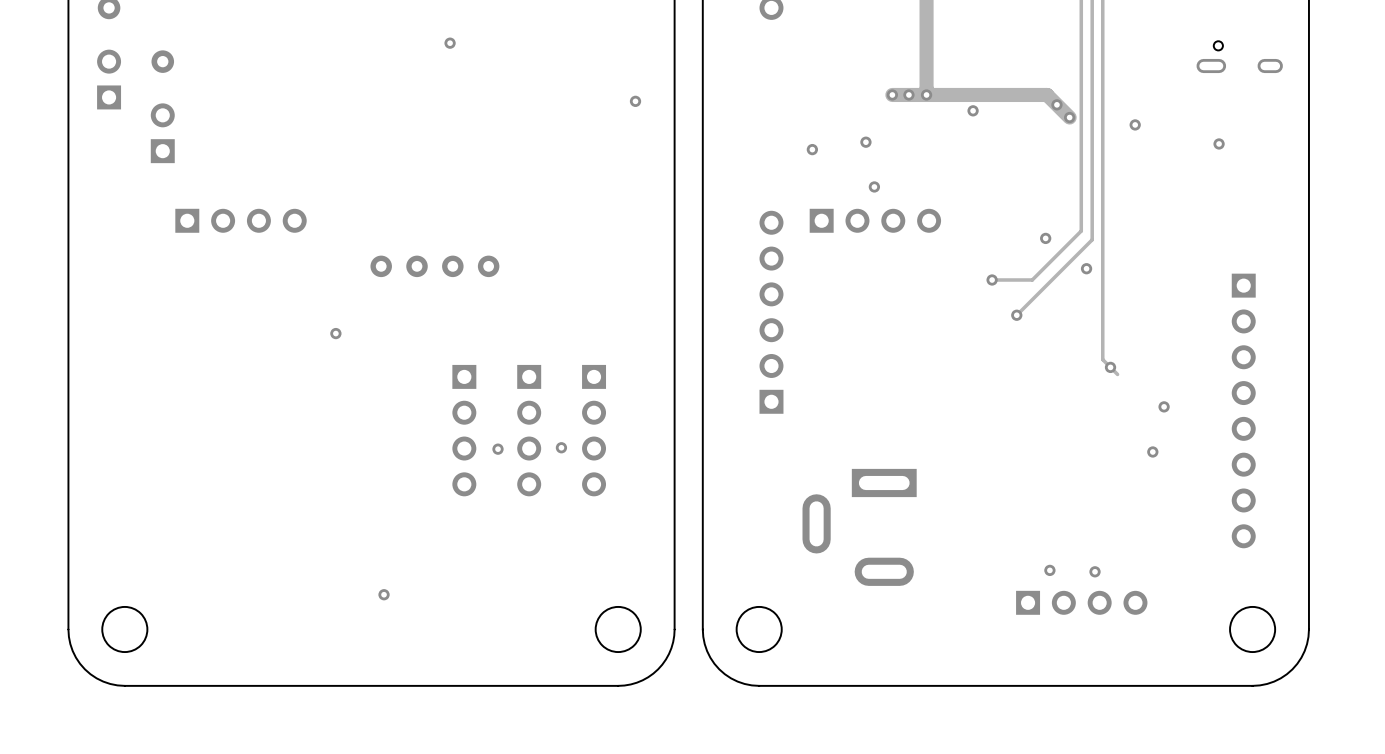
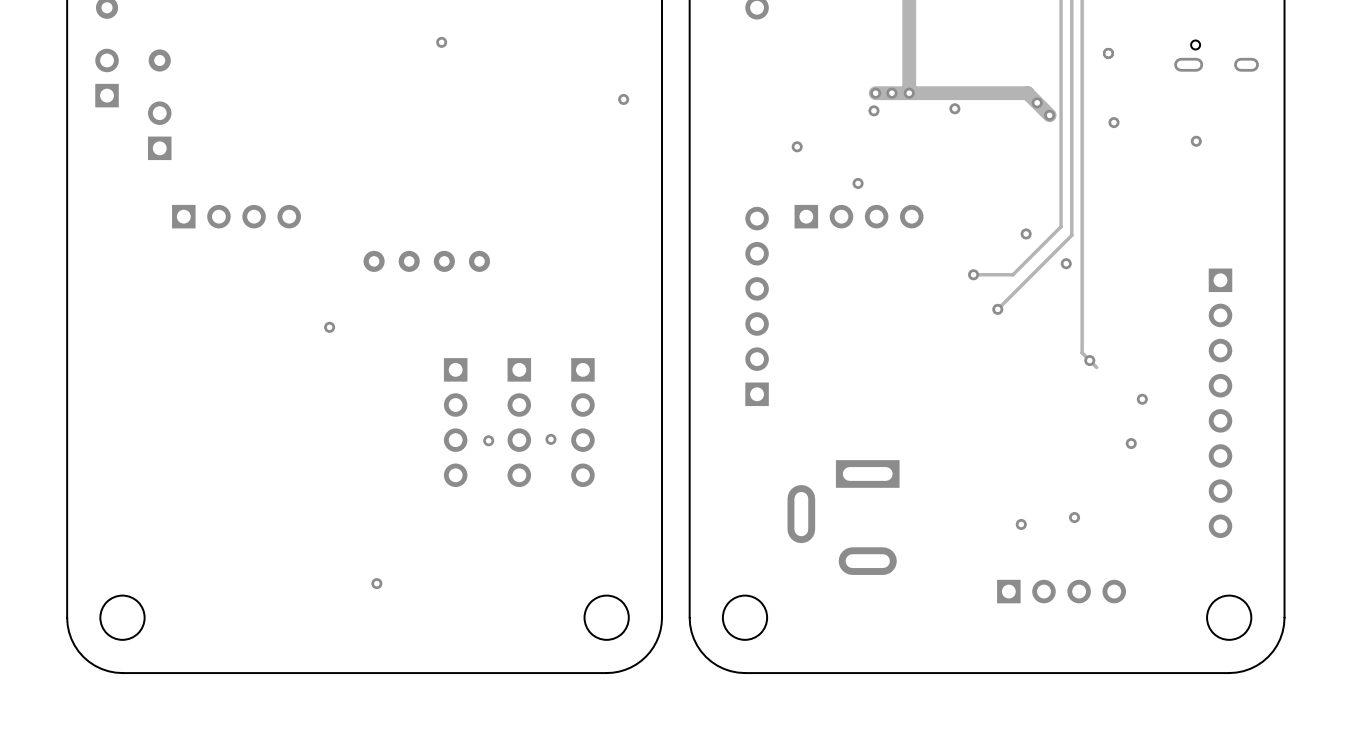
via: none -> (1108, 53)
via position: (865, 142) -> (873, 110)
via: none -> (1074, 517)
via: none -> (1021, 524)
via: (1049, 570) -> none
via: (1095, 571) -> none

